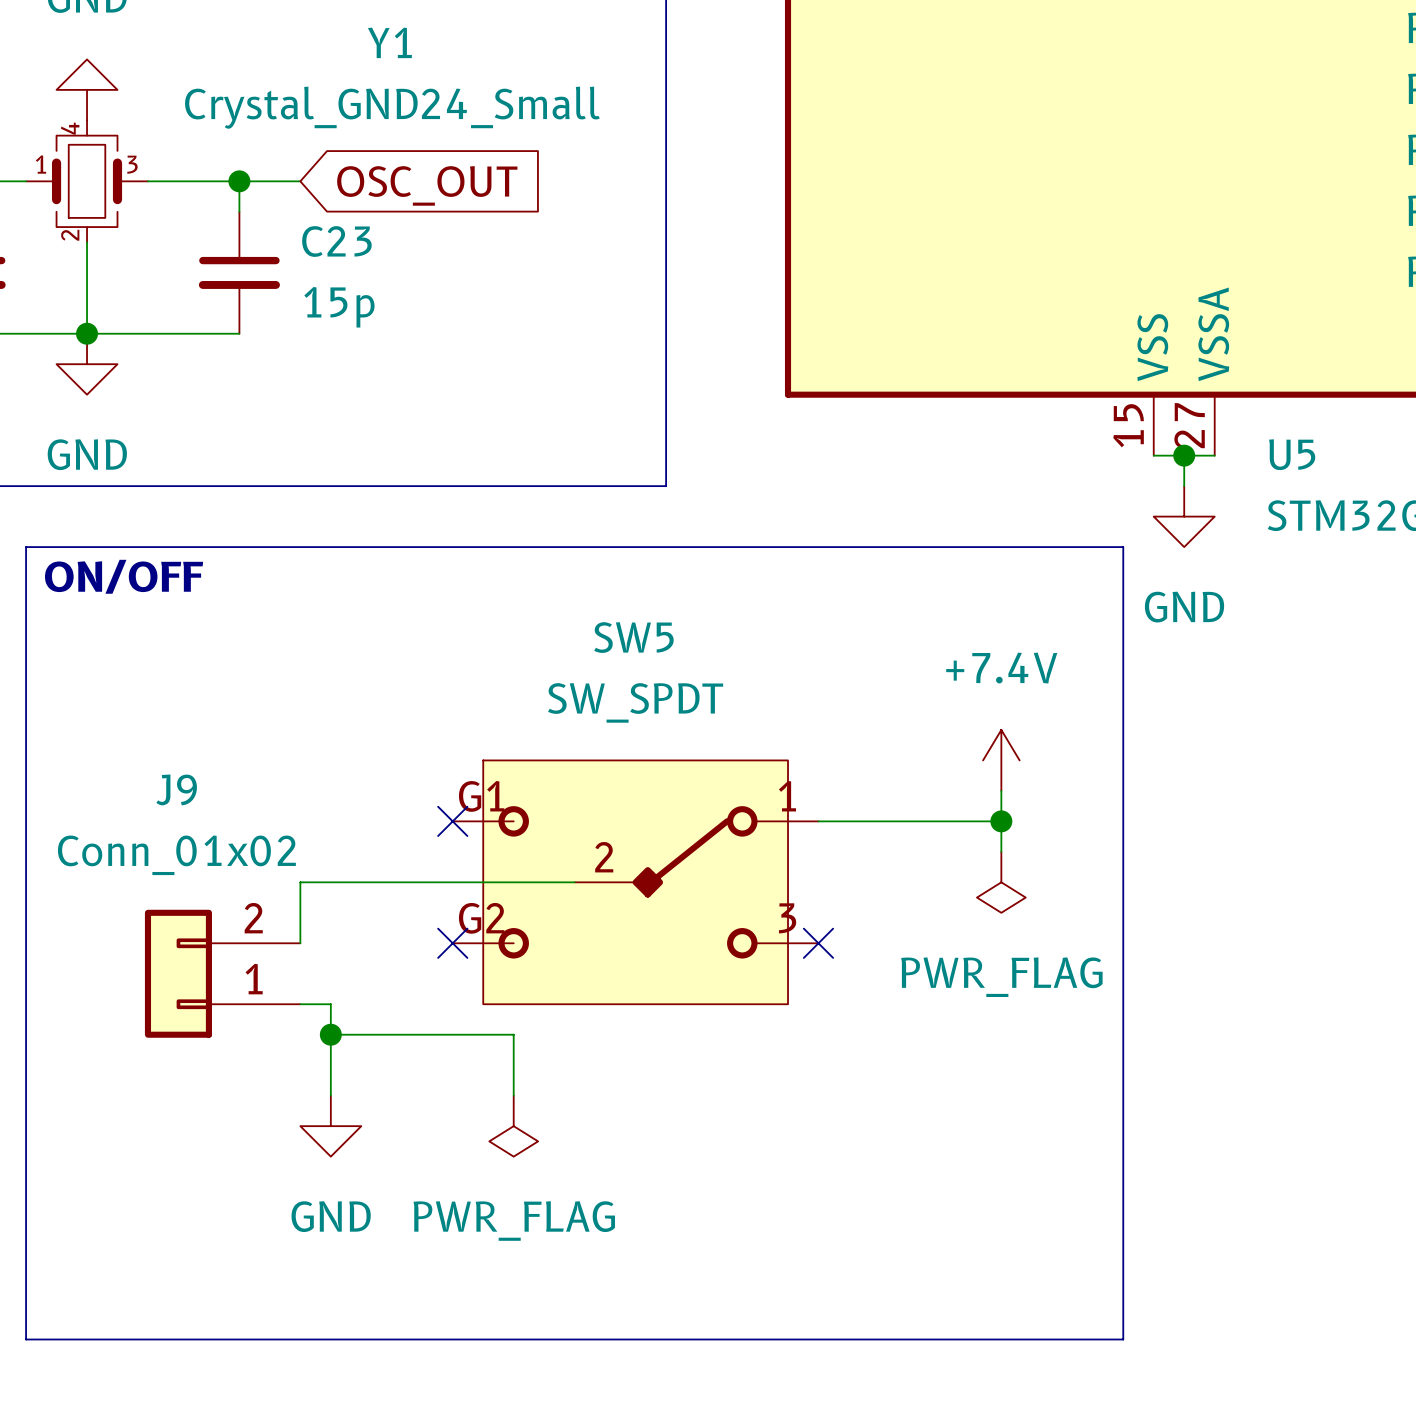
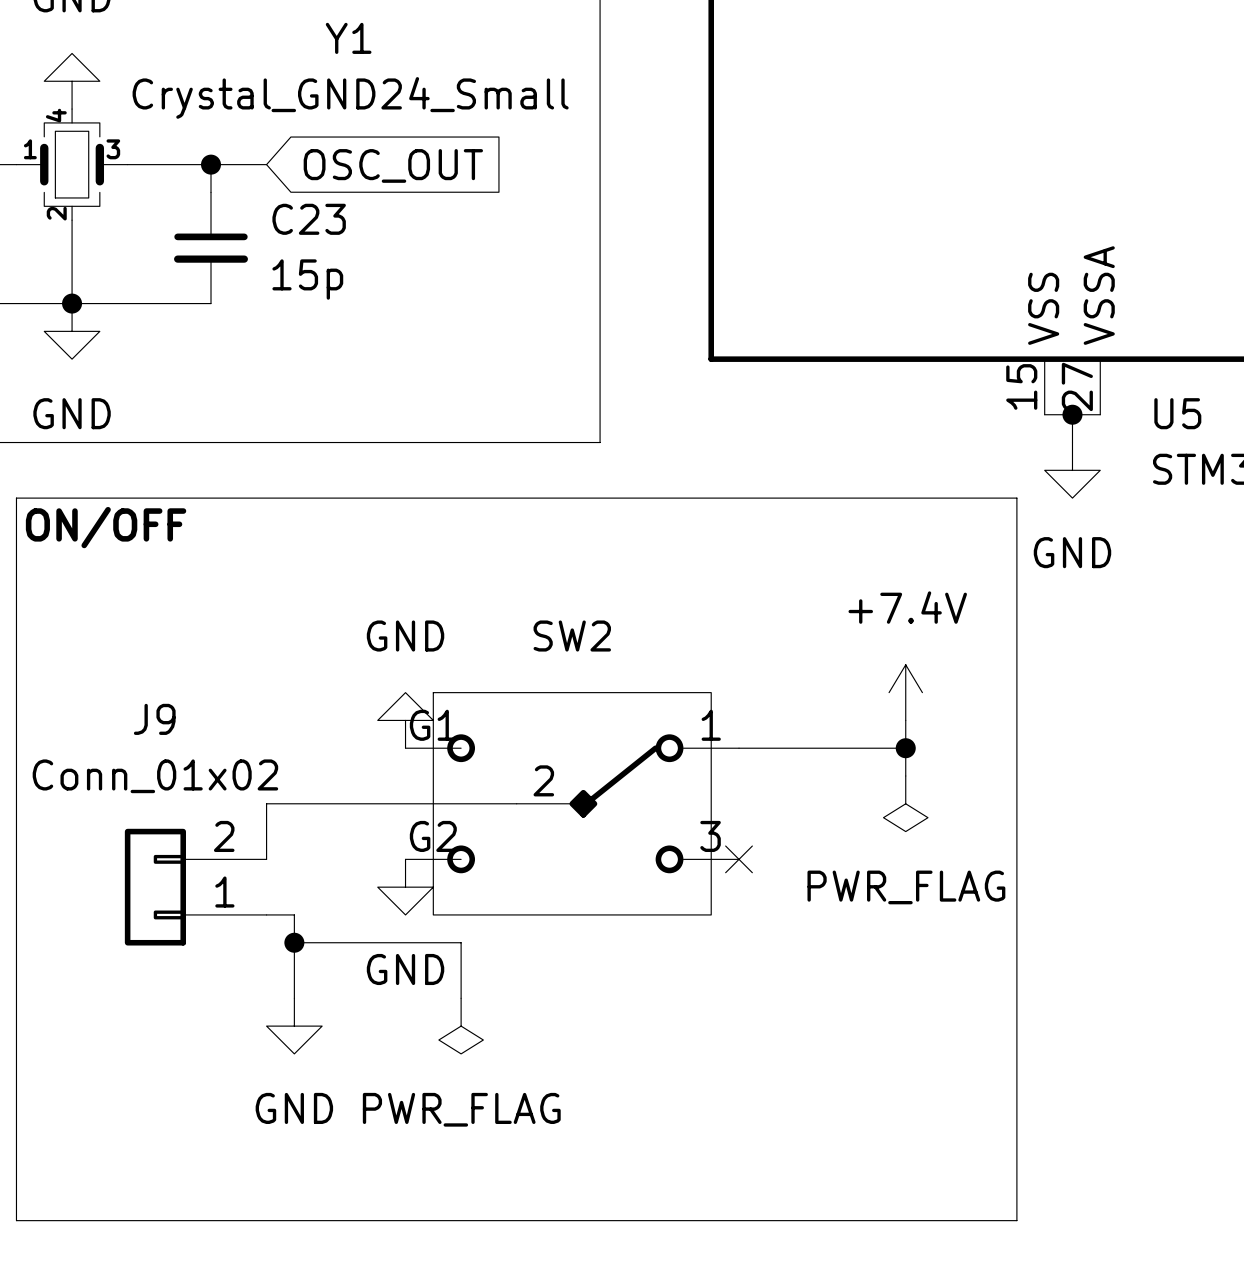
SW5 name: SW5 (633, 637) -> SW2 (572, 636)
SW5 value: SW_SPDT (635, 702) -> none
power symbol: none -> GND (405, 720)
no-connect mark: (452, 821) -> none
no-connect mark: (452, 943) -> none
power symbol: none -> GND (405, 887)

